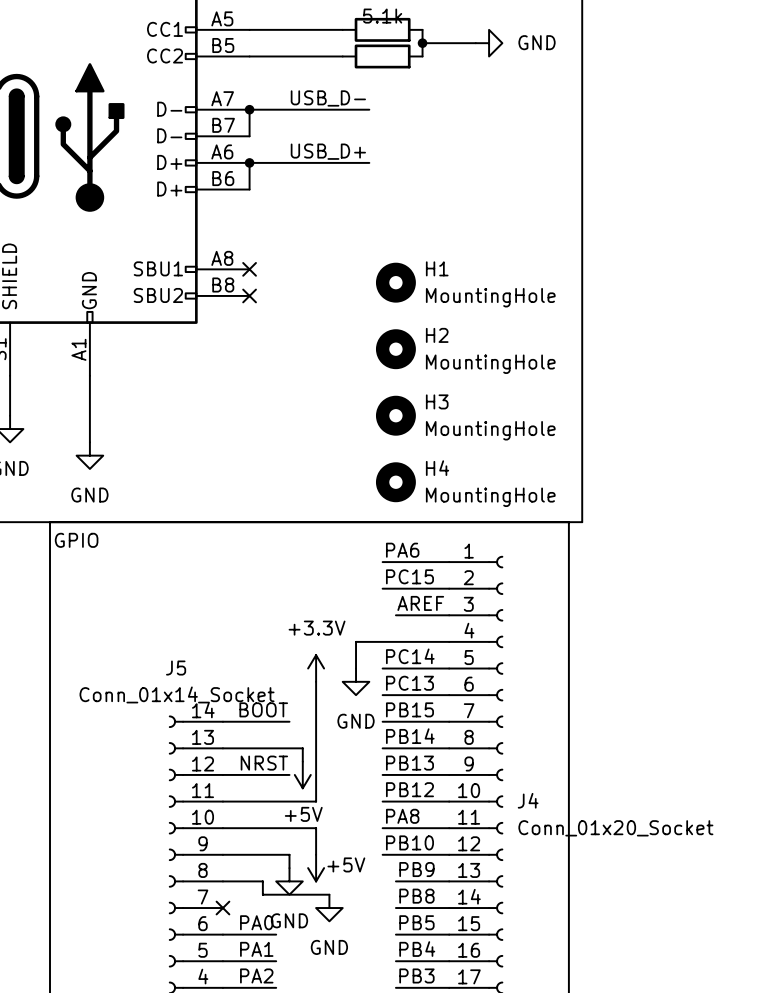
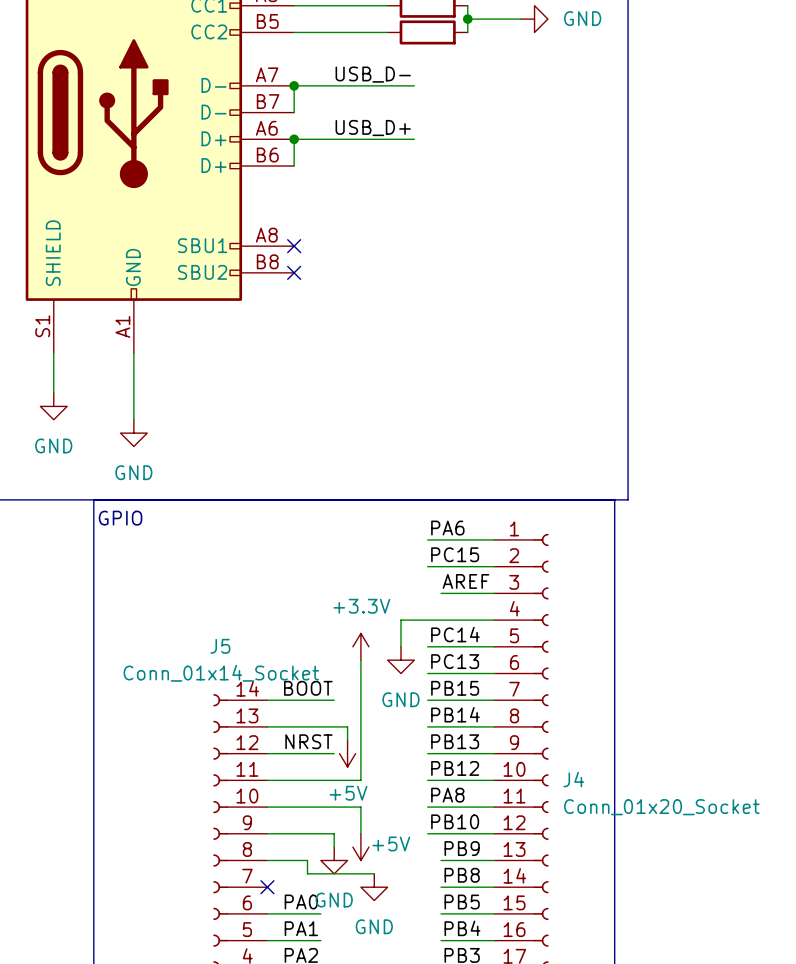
H1: MountingHole (395, 282) -> none
H2: MountingHole (395, 349) -> none
H3: MountingHole (395, 415) -> none
H4: MountingHole (395, 482) -> none

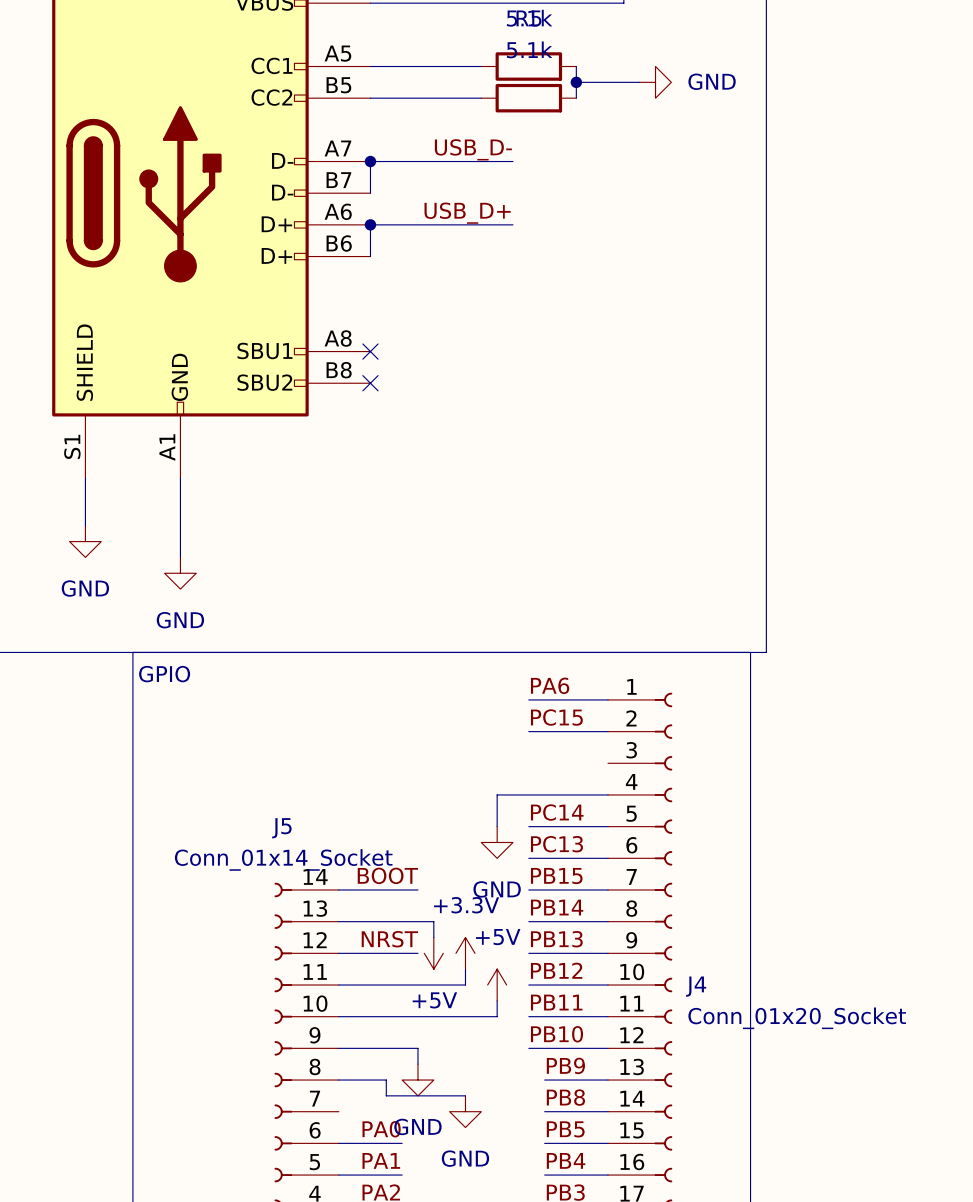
label: AREF (465, 581) -> none
wire: (441, 593) (494, 593) -> none
power symbol position: +3.3V (360, 646) -> +3.3V (465, 953)
wire: (360, 660) (360, 780) -> (465, 969) (465, 985) (449, 985)
label: PA8 (447, 795) -> PB11 (556, 1002)
wire: (360, 807) (360, 833) -> (449, 1016) (497, 1016) (497, 1000)
power symbol text position: +5V (391, 843) -> +5V (498, 937)
power symbol rotation: 0° (360, 847) -> 180° (497, 985)
power symbol position: +5V (360, 847) -> +5V (497, 985)
no-connect mark: (267, 887) -> none

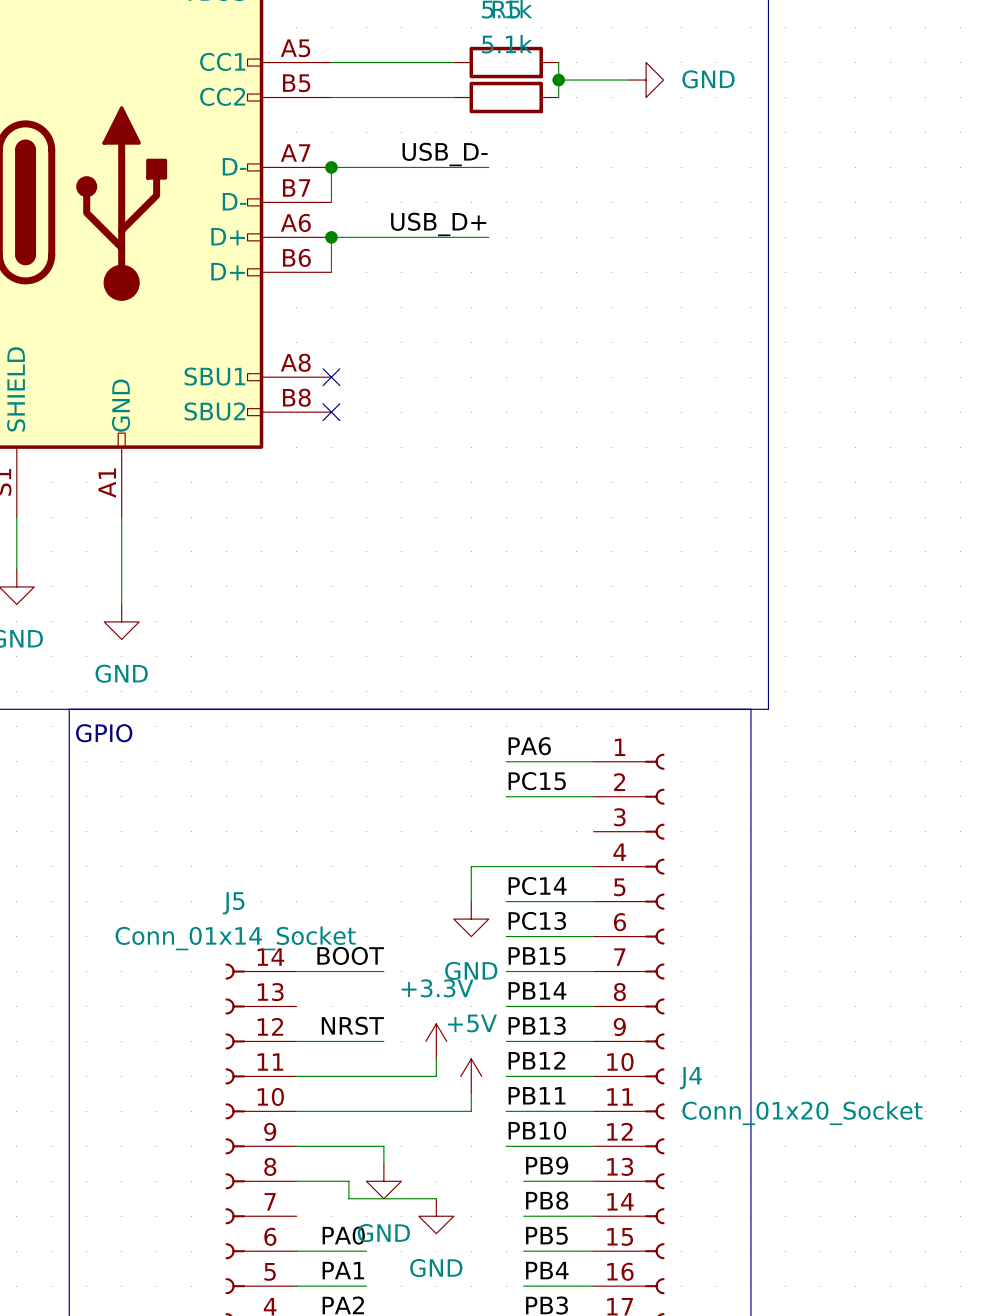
wire: (338, 921) (433, 921) (433, 937) -> none
power symbol: +5V (433, 953) -> none

